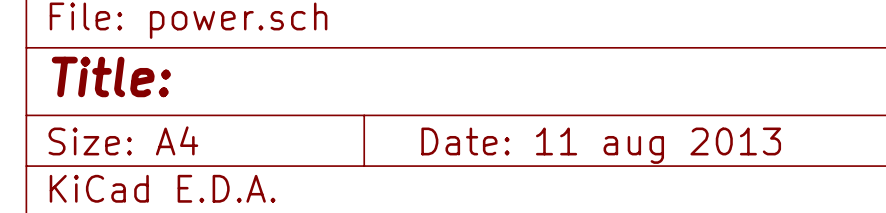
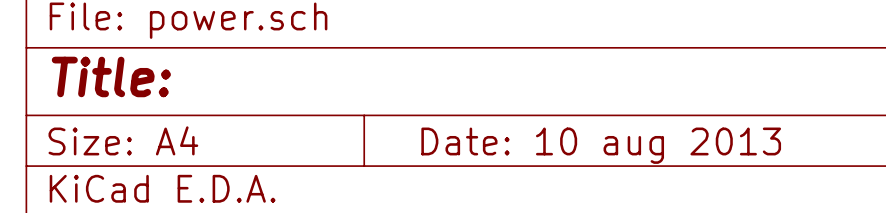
title block: Date: 11 aug 2013 (601, 145) -> Date: 10 aug 2013 (601, 145)

